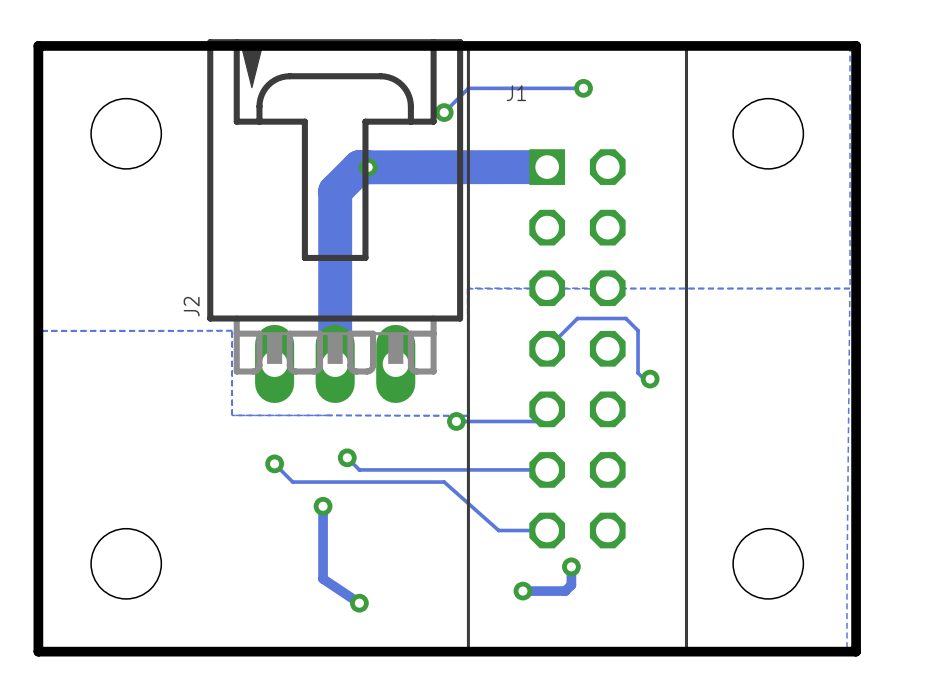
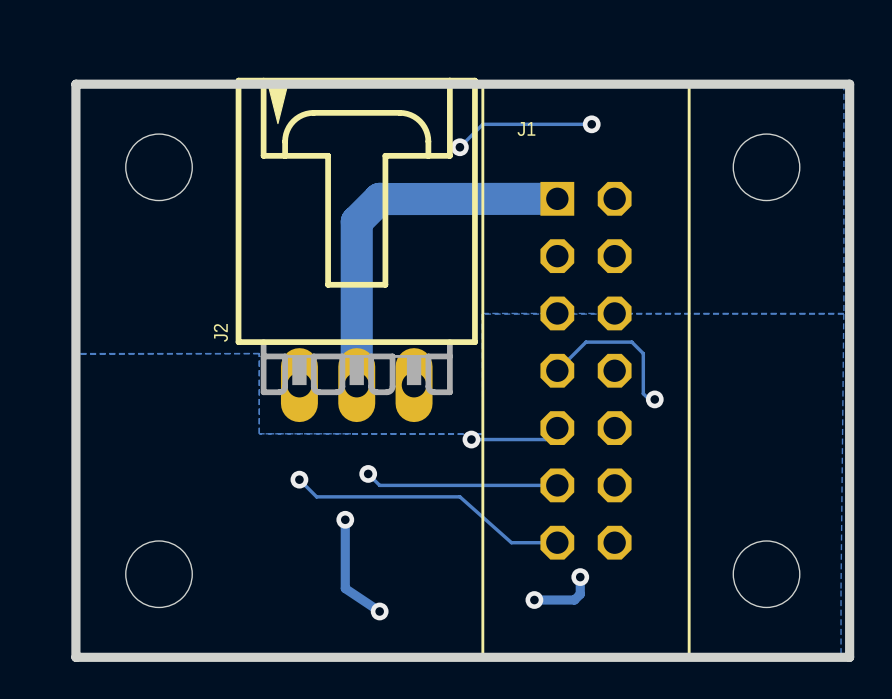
via: (368, 167) -> none

